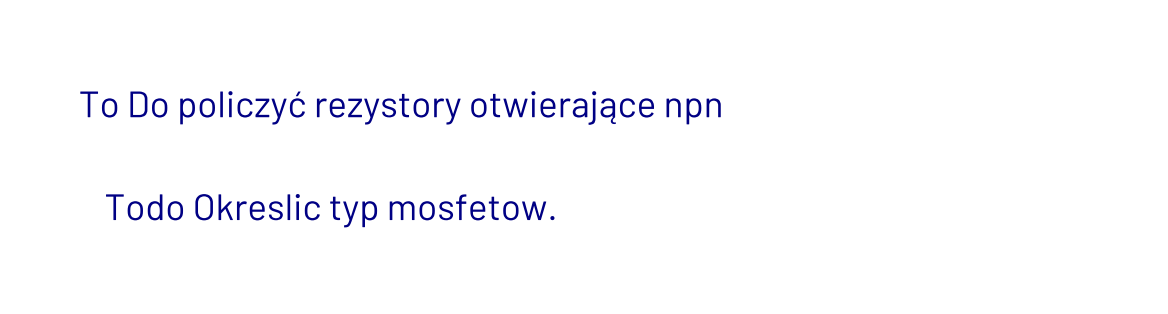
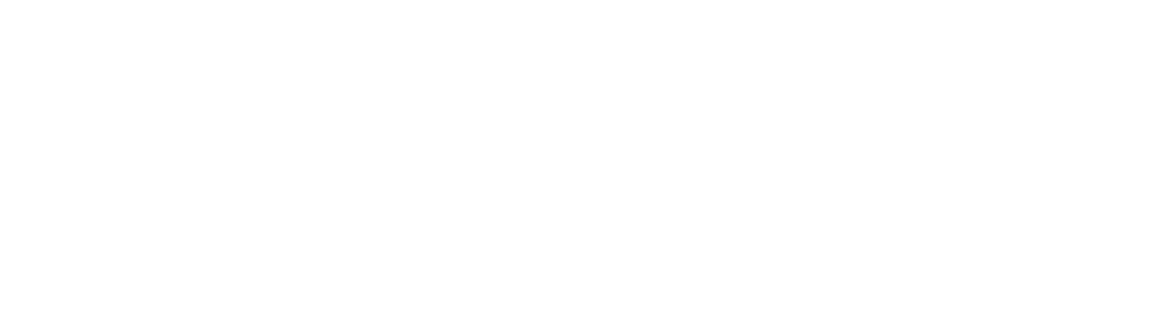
text: To Do policzyć rezystory otwierające npn (400, 108) -> none
text: Todo Okreslic typ mosfetow. (330, 210) -> none

